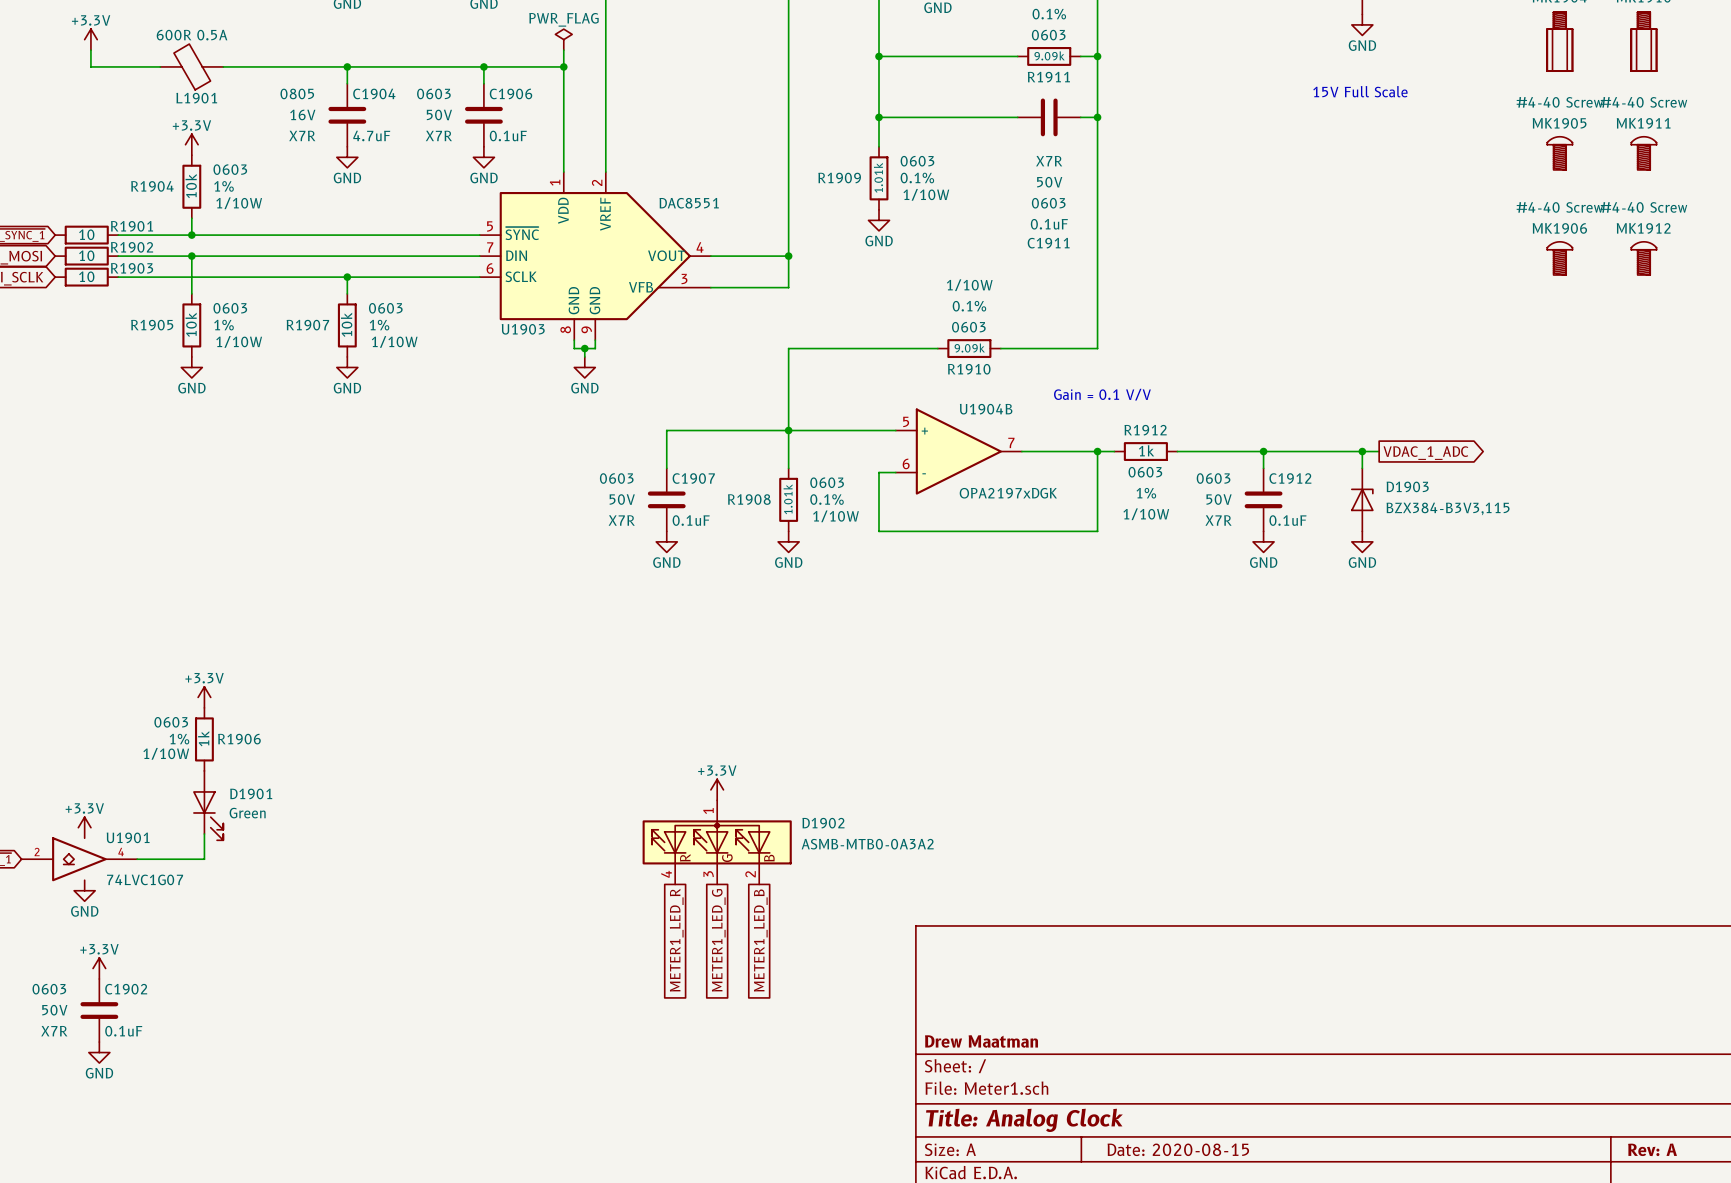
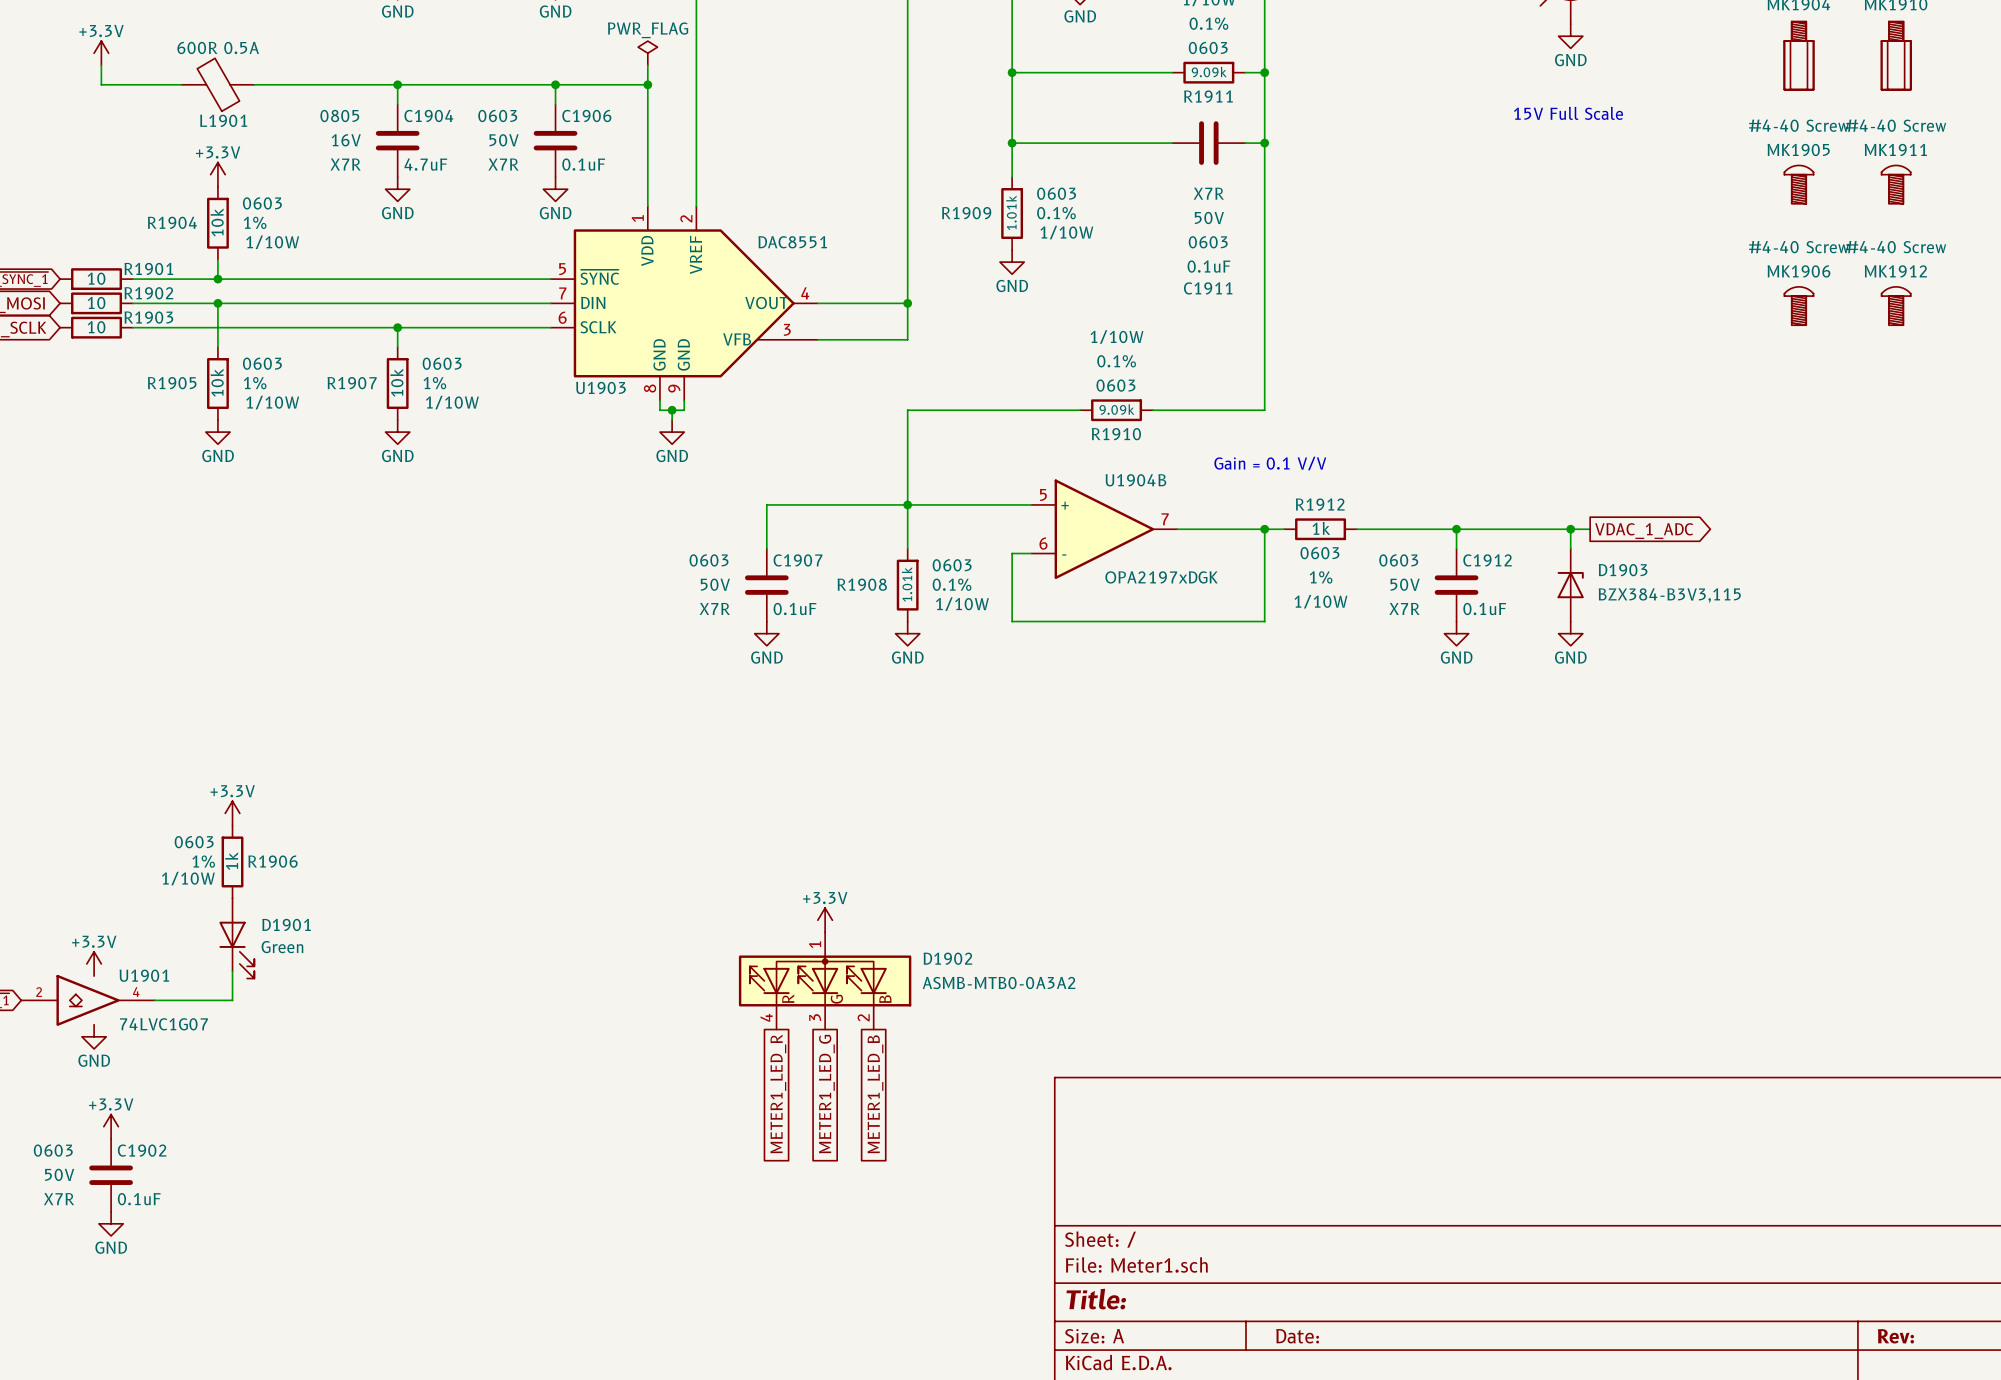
title block: Drew Maatman (981, 1041) -> none
title block: Title: Analog Clock (1024, 1120) -> Title: (1096, 1299)
title block: Date: 2020-08-15 (1178, 1149) -> Date: (1297, 1336)
title block: Rev: A (1652, 1149) -> Rev: (1895, 1336)

